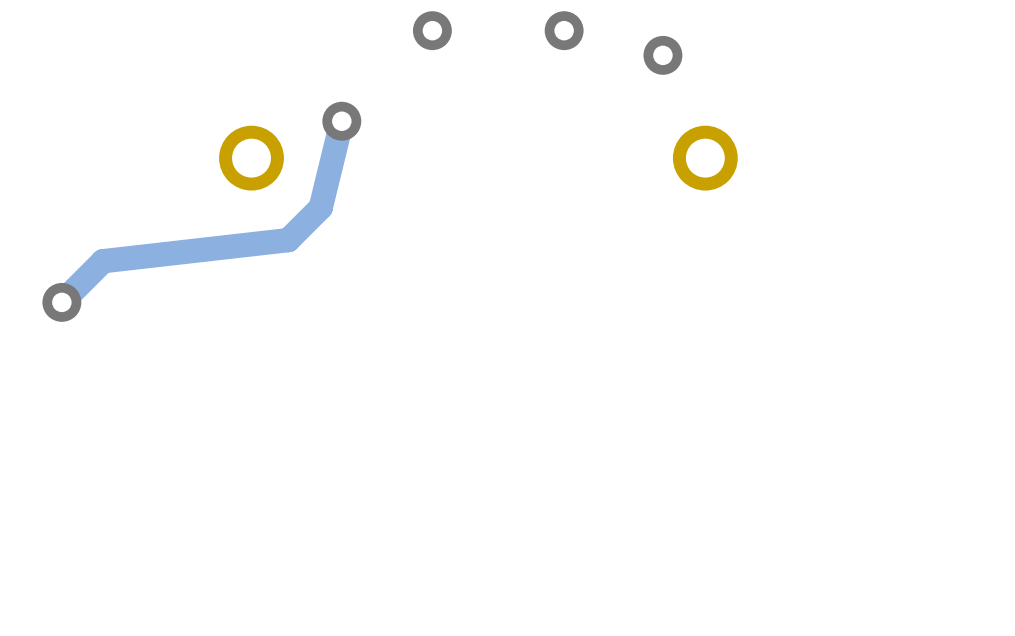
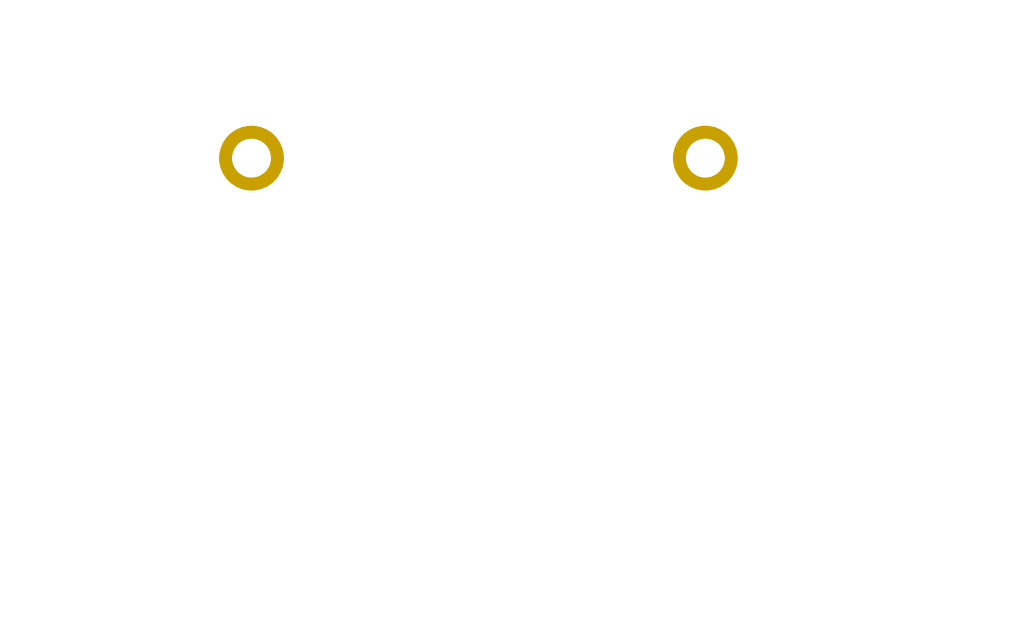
via: (432, 30) -> none
via: (564, 30) -> none
via: (662, 55) -> none
track: (341, 121) (320, 207) (288, 240) (103, 261) (61, 302) -> none
via: (341, 121) -> none
via: (61, 302) -> none

